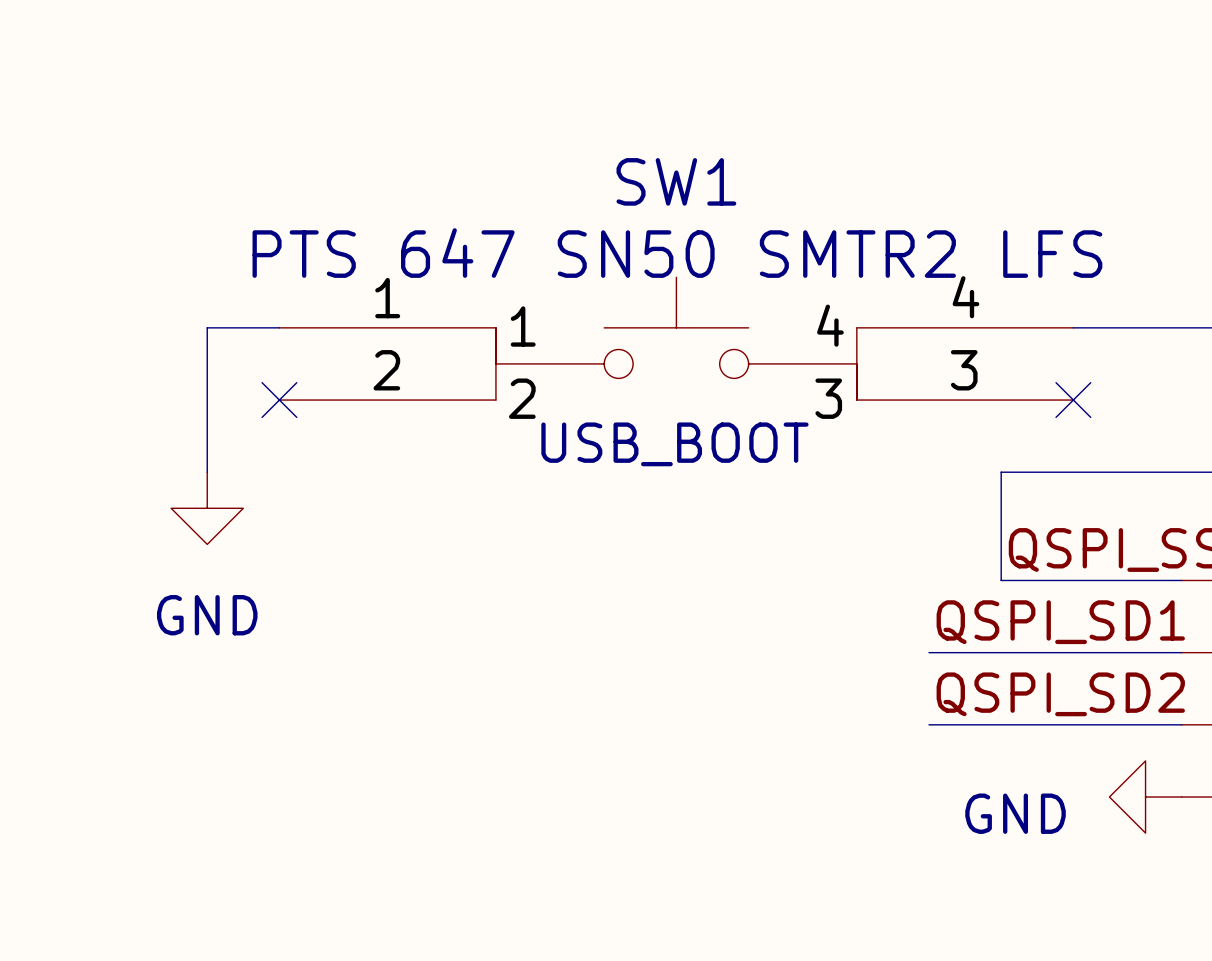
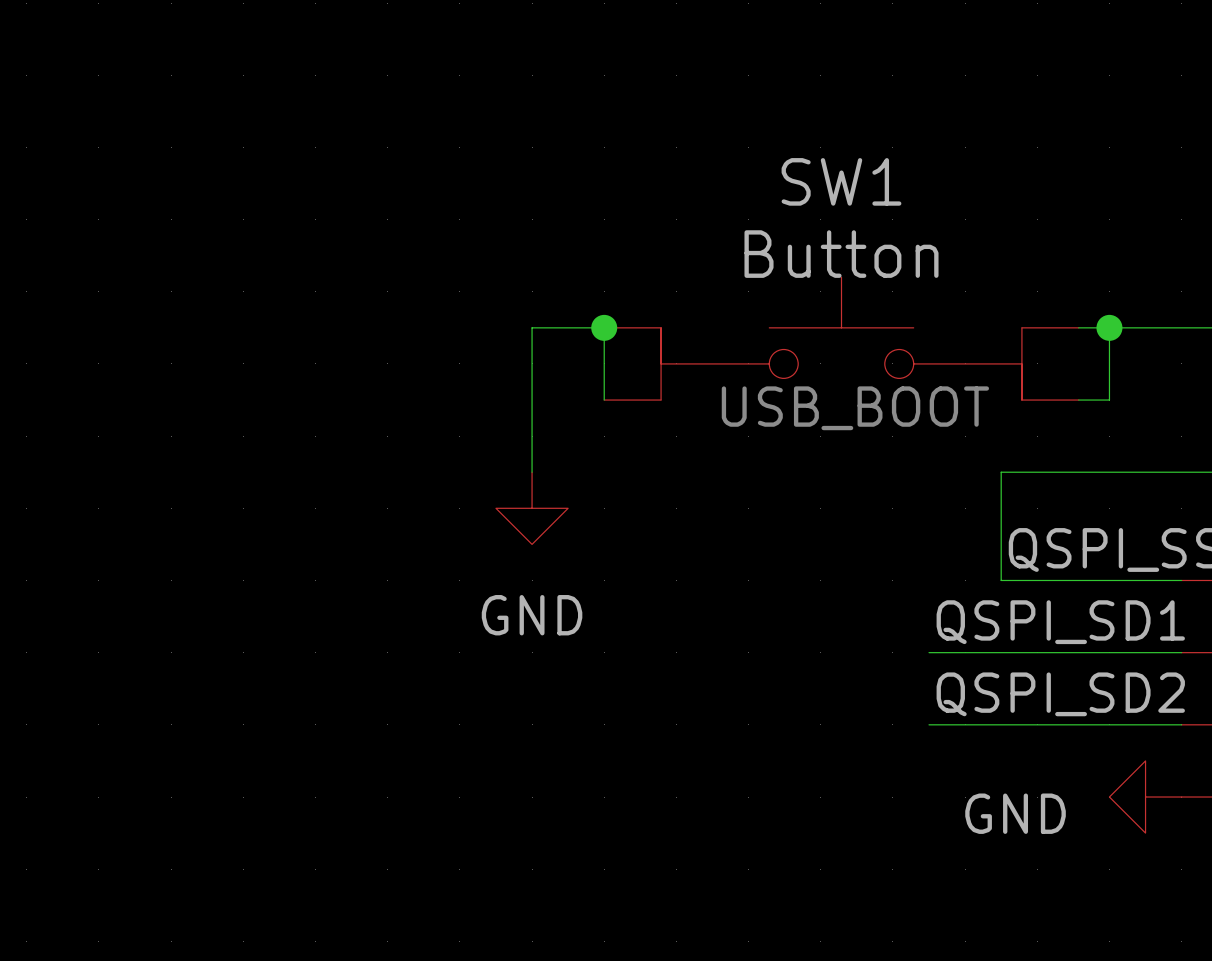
SW1 value: PTS 647 SN50 SMTR2 LFS (677, 253) -> Button (841, 254)
SW1 symbol: [279, 277, 1074, 401] -> [604, 277, 1079, 401]
wire: (279, 327) (207, 327) (207, 472) -> none
junction: none -> (604, 327)
wire: none -> (1109, 327) (1109, 400) (1078, 400)
junction: none -> (1109, 327)
no-connect mark: (279, 400) -> none
wire: none -> (604, 400) (604, 327) (532, 327) (532, 472)
no-connect mark: (1073, 400) -> none
text position: USB_BOOT (674, 444) -> USB_BOOT (855, 408)
power symbol position: GND (207, 508) -> GND (532, 508)

